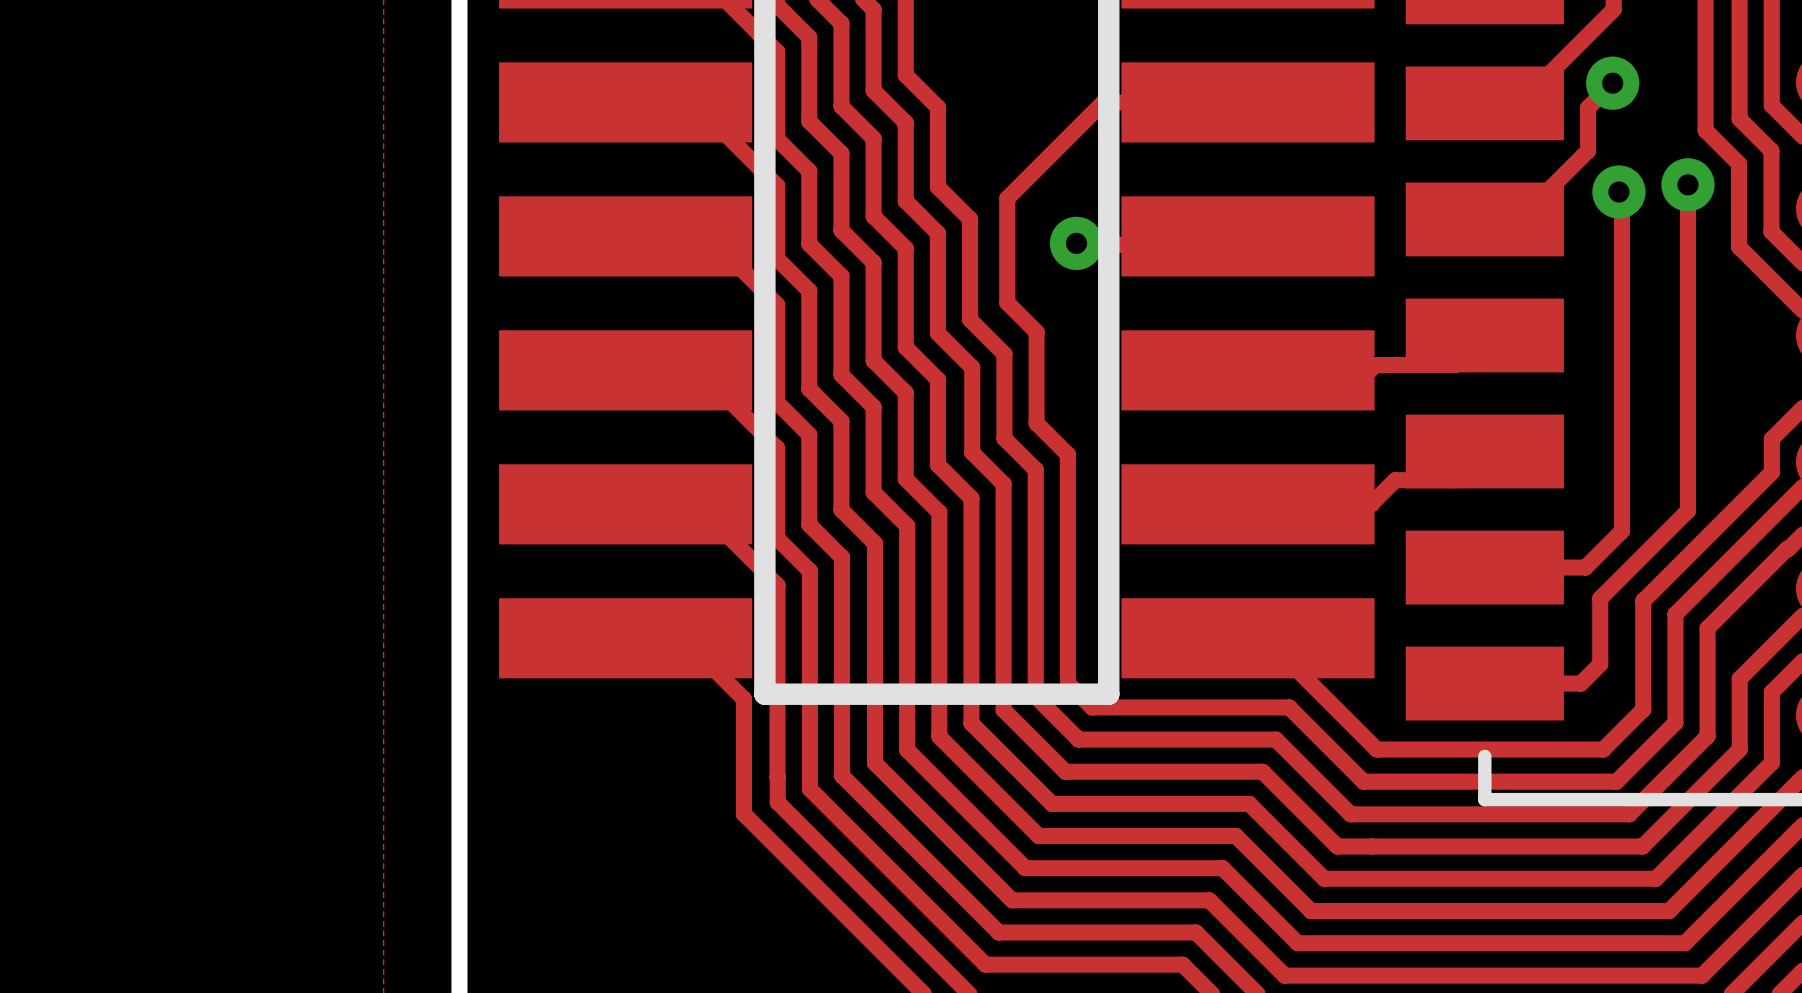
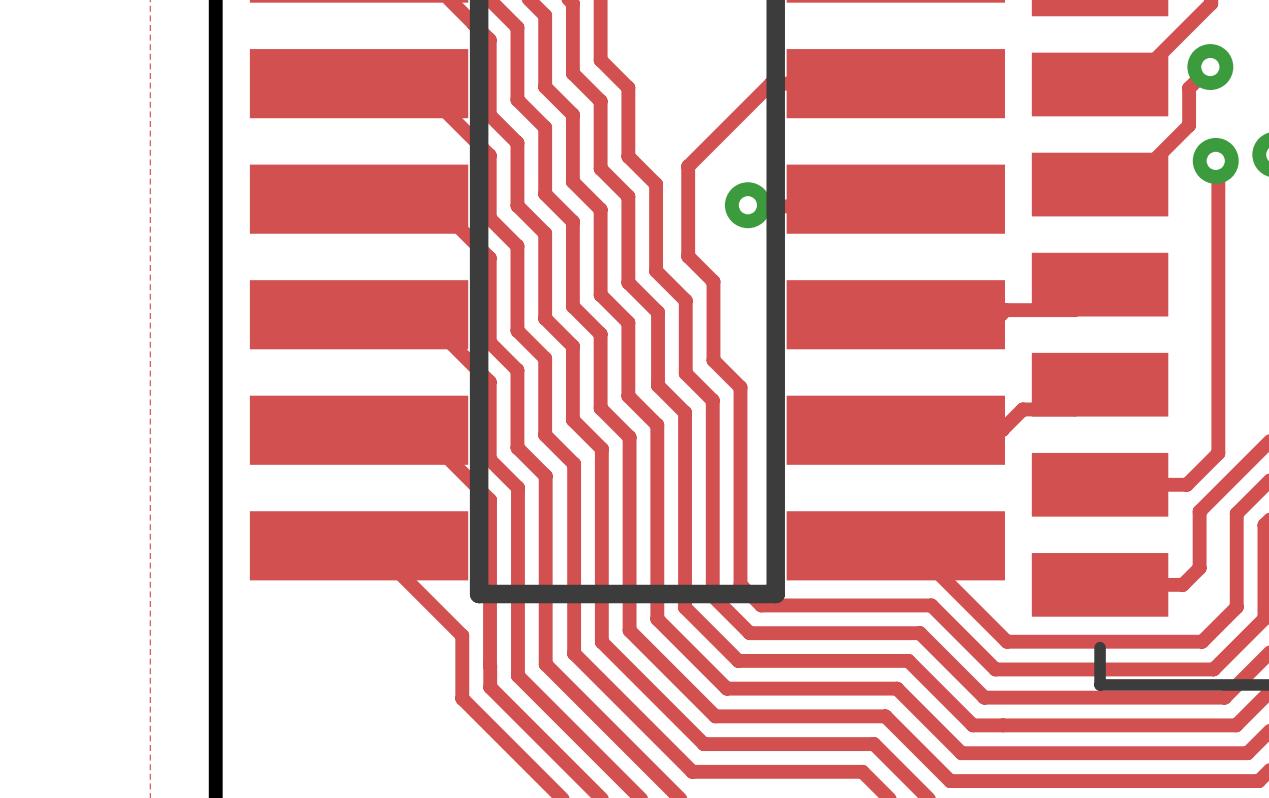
track: (683, 638) (743, 699) (743, 814) -> (372, 545) (462, 635) (462, 698)

